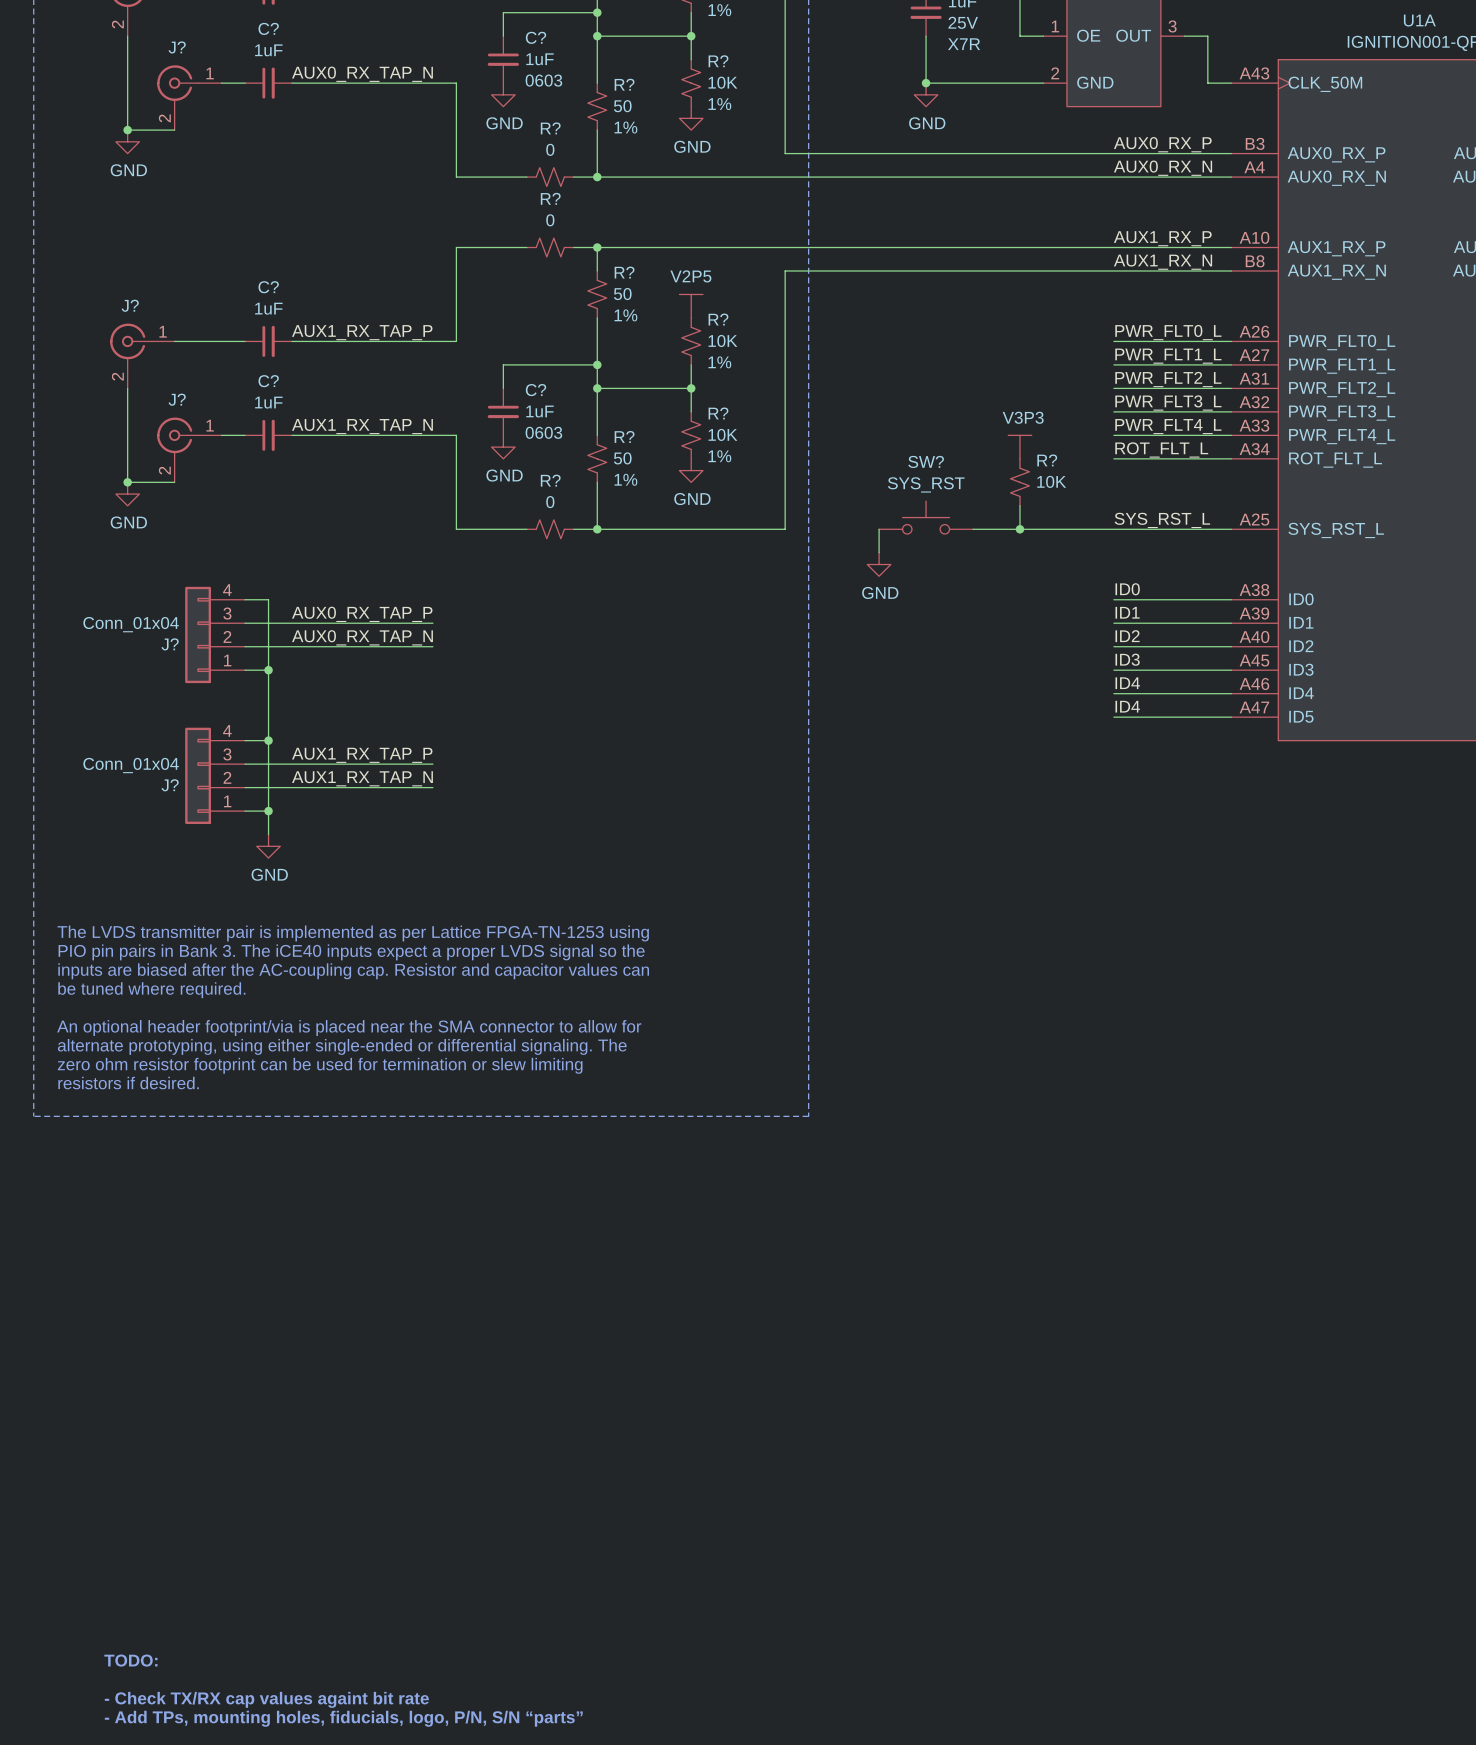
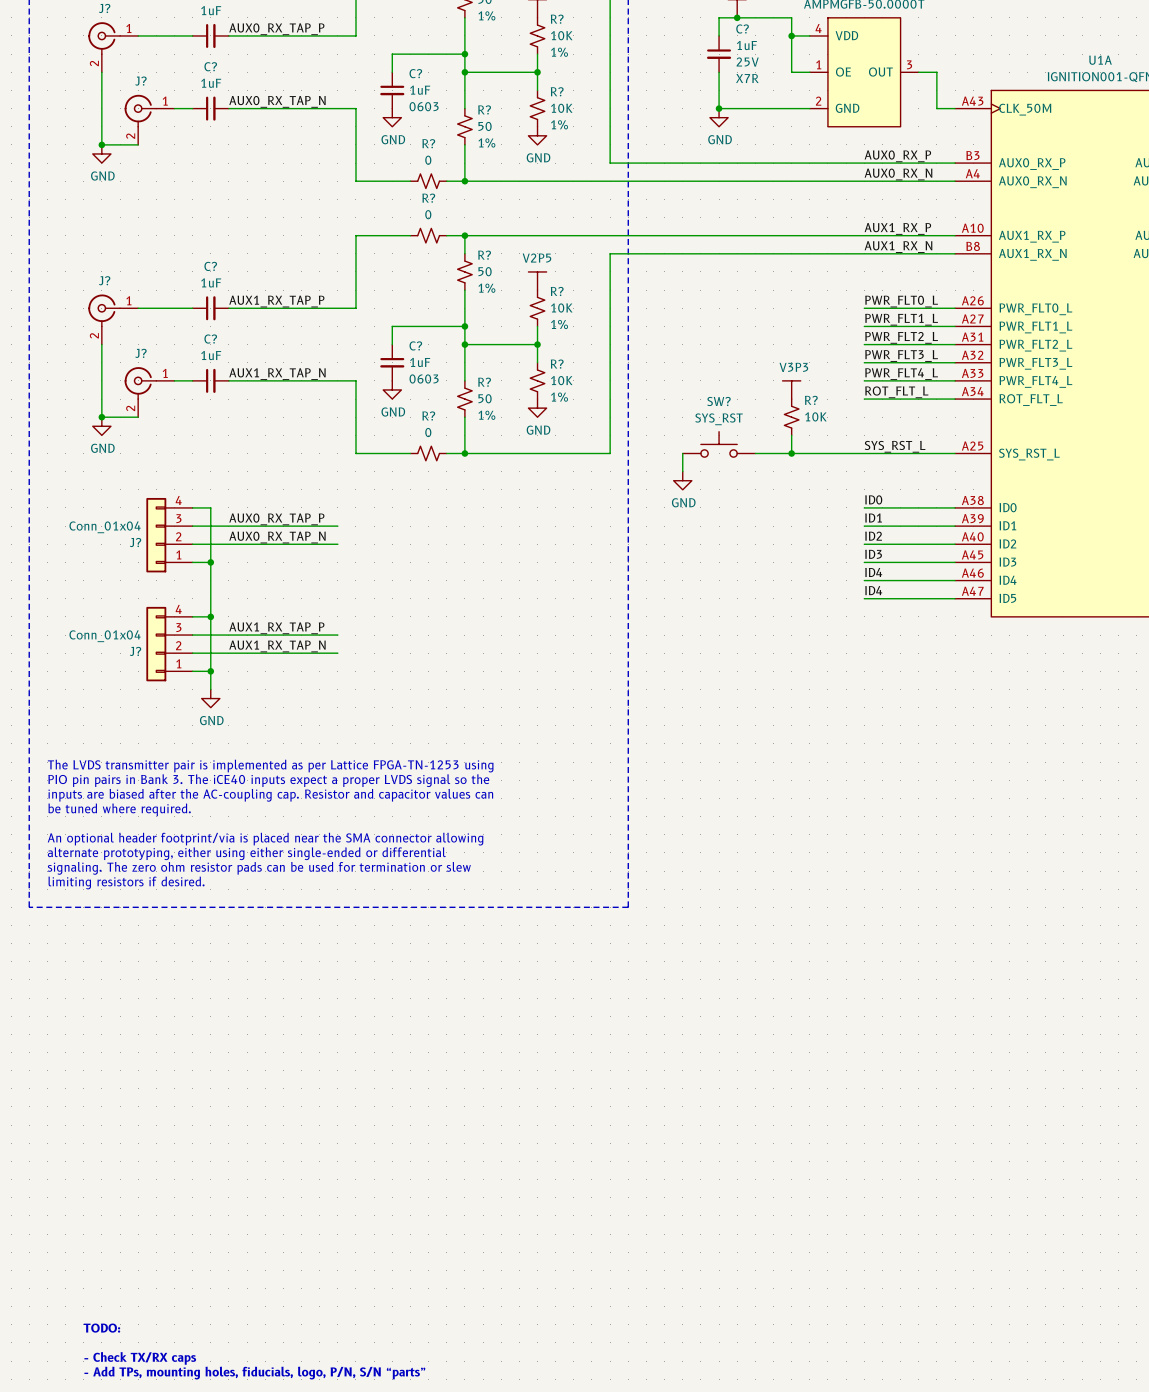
text: An optional header footprint/via is placed near the SMA connector to allow for (349, 1028) -> An optional header footprint/via is placed near the SMA connector allowing (265, 839)
text: alternate prototyping, using either single-ended or differential signaling. The (342, 1046) -> alternate prototyping, either using either single-ended or differential (246, 853)
text: zero ohm resistor footprint can be used for termination or slew limiting (320, 1065) -> signaling. The zero ohm resistor pads can be used for termination or slew (259, 868)
text: resistors if desired. (128, 1083) -> limiting resistors if desired. (126, 882)
text: - Check TX/RX cap values againt bit rate (266, 1699) -> - Check TX/RX caps (140, 1358)

